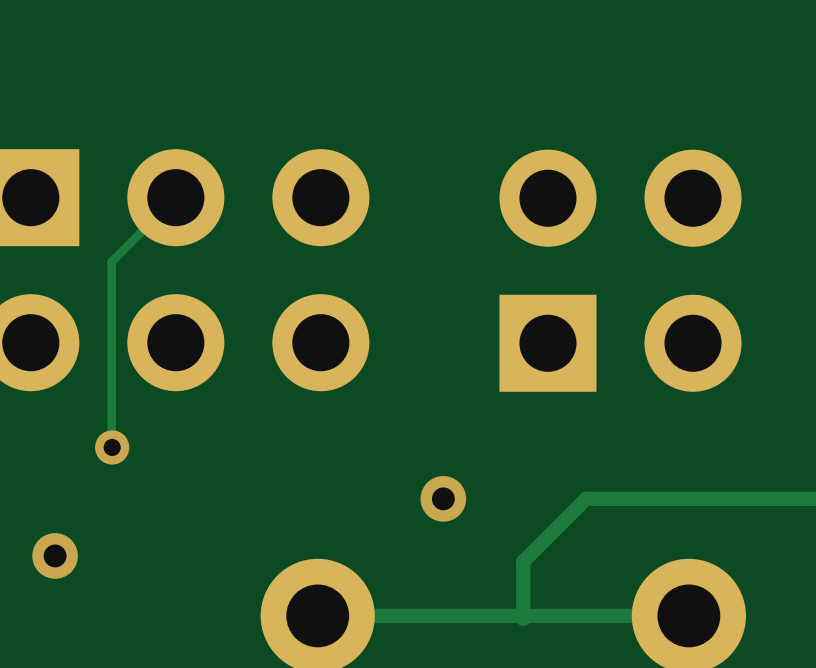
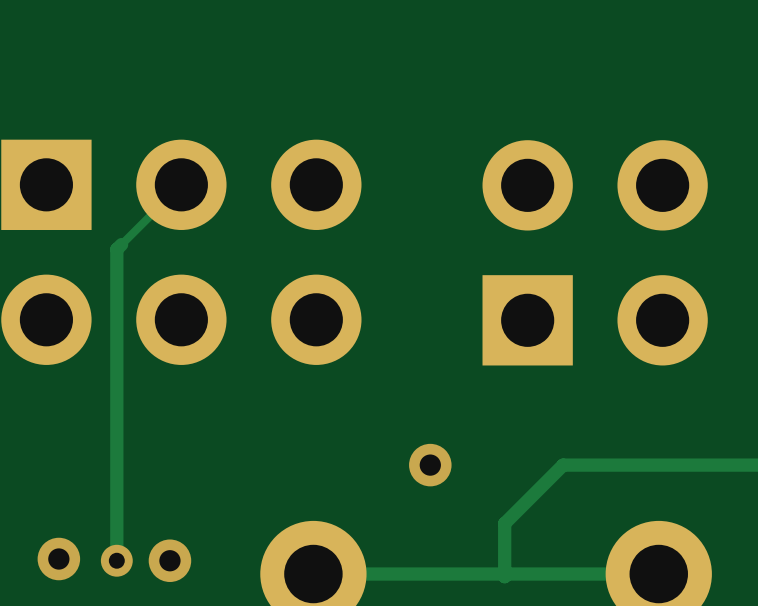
track: (111, 261) (111, 446) -> (121, 244) (116, 249) (116, 560)
via position: (112, 447) -> (116, 560)
via position: (55, 555) -> (58, 559)
via: none -> (169, 560)

